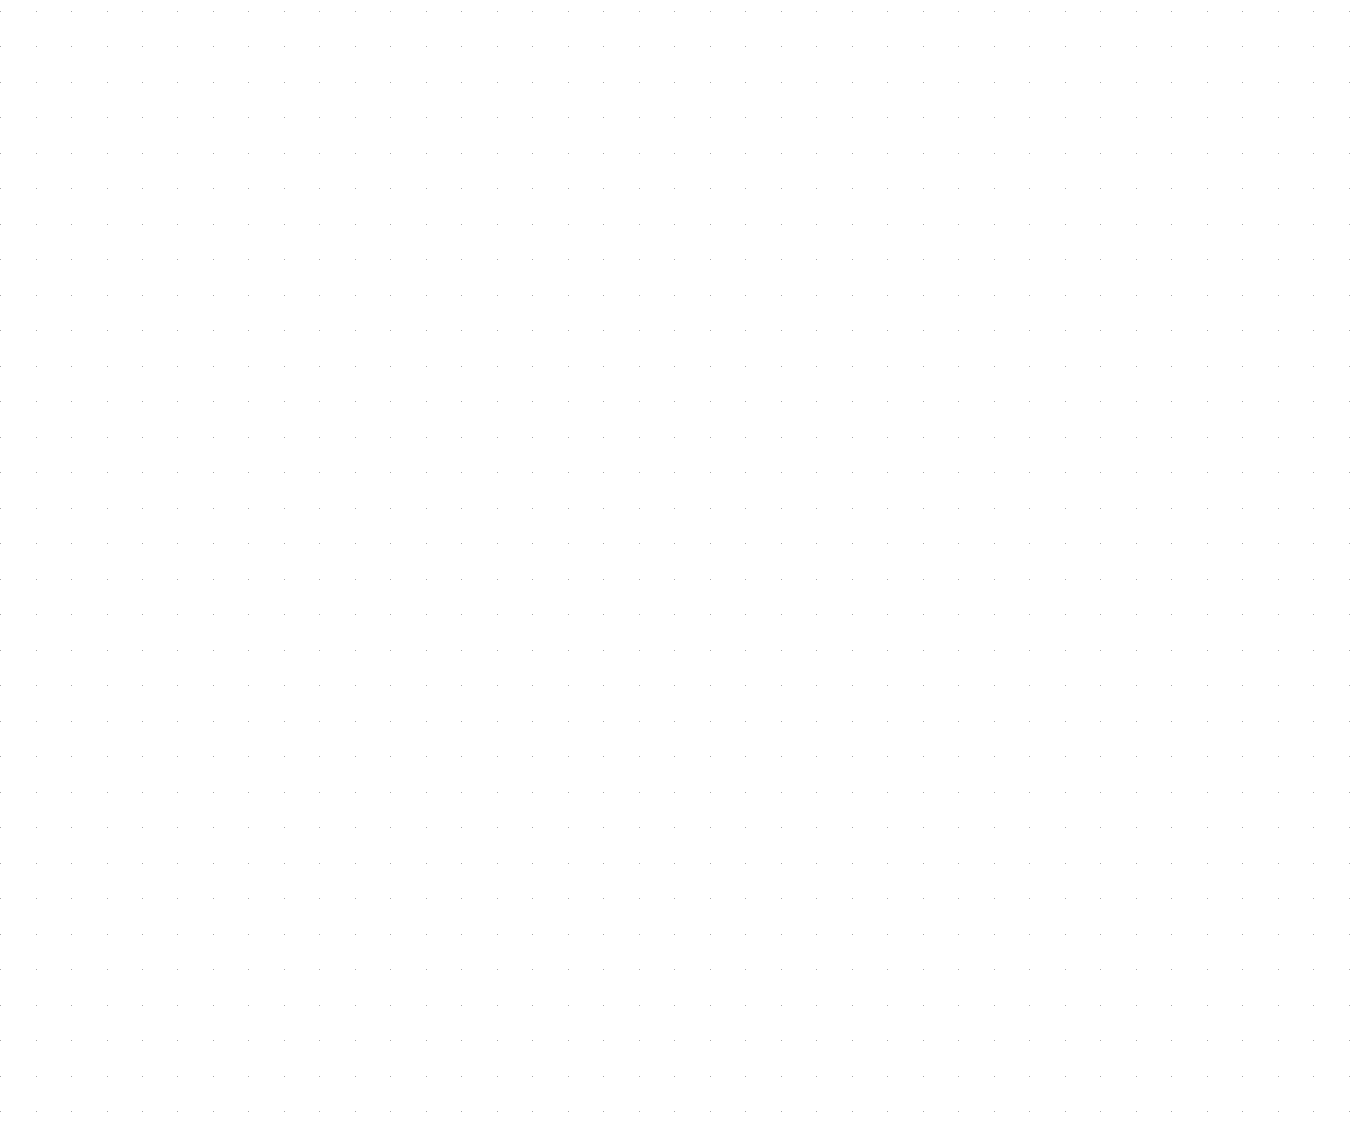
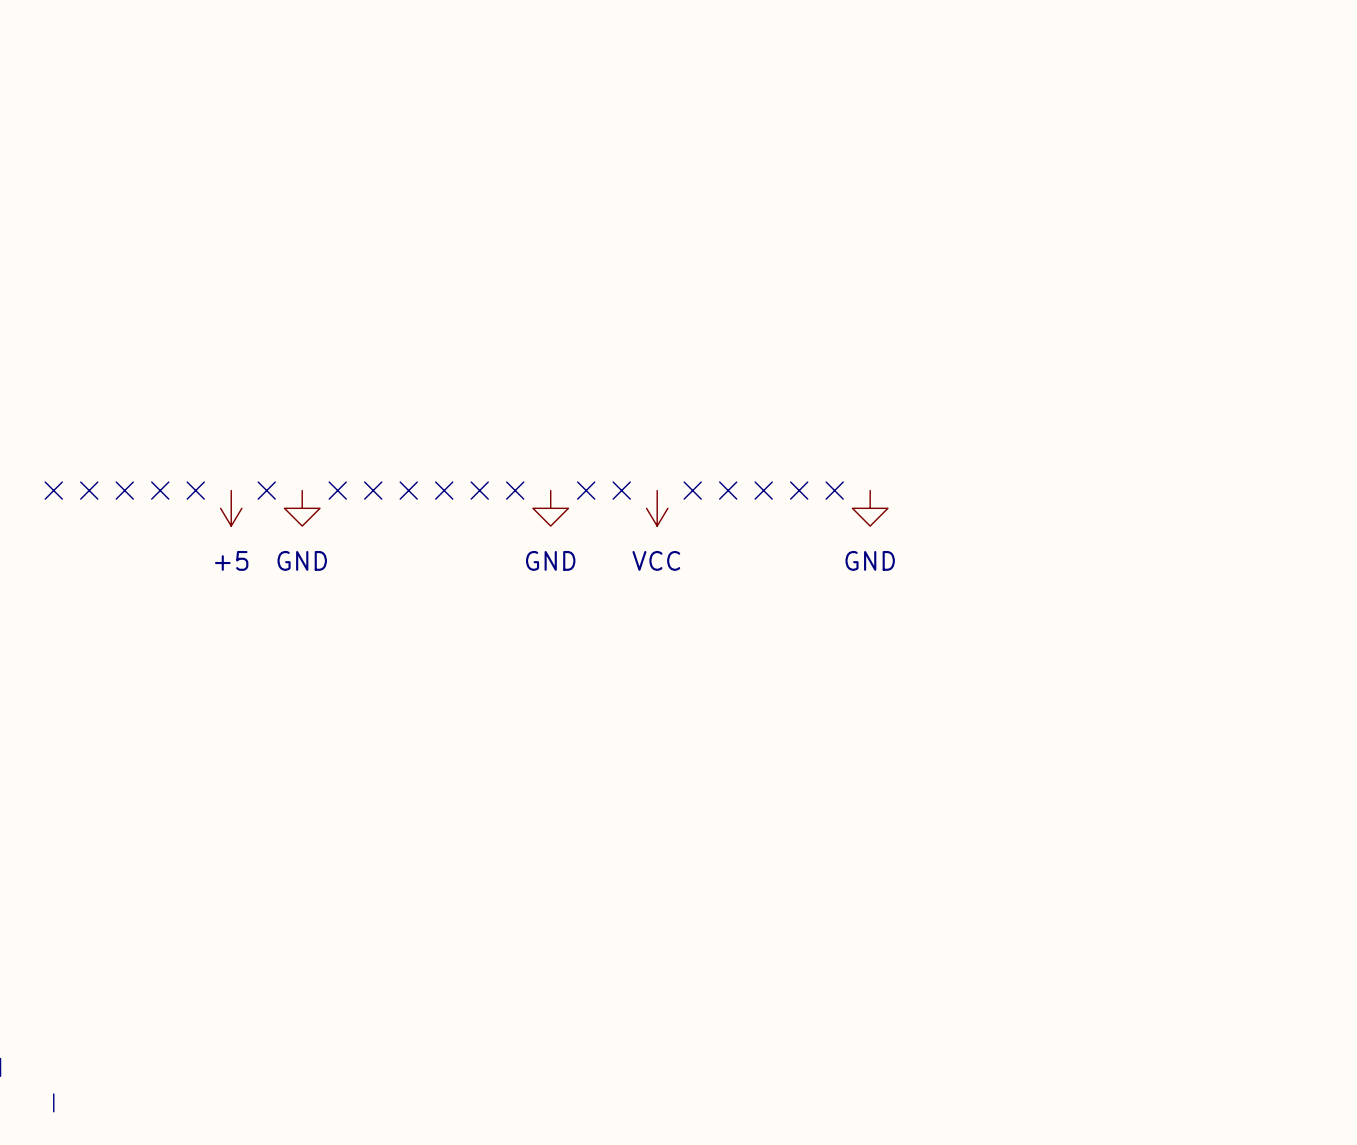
no-connect mark: none -> (53, 490)
no-connect mark: none -> (89, 490)
no-connect mark: none -> (124, 490)
no-connect mark: none -> (160, 490)
no-connect mark: none -> (195, 490)
no-connect mark: none -> (266, 490)
no-connect mark: none -> (337, 490)
no-connect mark: none -> (373, 490)
no-connect mark: none -> (408, 490)
no-connect mark: none -> (444, 490)
no-connect mark: none -> (479, 490)
no-connect mark: none -> (515, 490)
no-connect mark: none -> (586, 490)
no-connect mark: none -> (621, 490)
no-connect mark: none -> (692, 490)
no-connect mark: none -> (728, 490)
no-connect mark: none -> (763, 490)
no-connect mark: none -> (799, 490)
no-connect mark: none -> (834, 490)
power symbol: none -> +5 (231, 508)
power symbol: none -> GND (302, 508)
power symbol: none -> GND (550, 508)
power symbol: none -> VCC (657, 508)
power symbol: none -> GND (870, 508)
wire: none -> (0, 1058) (0, 1076)
wire: none -> (53, 1094) (53, 1111)

